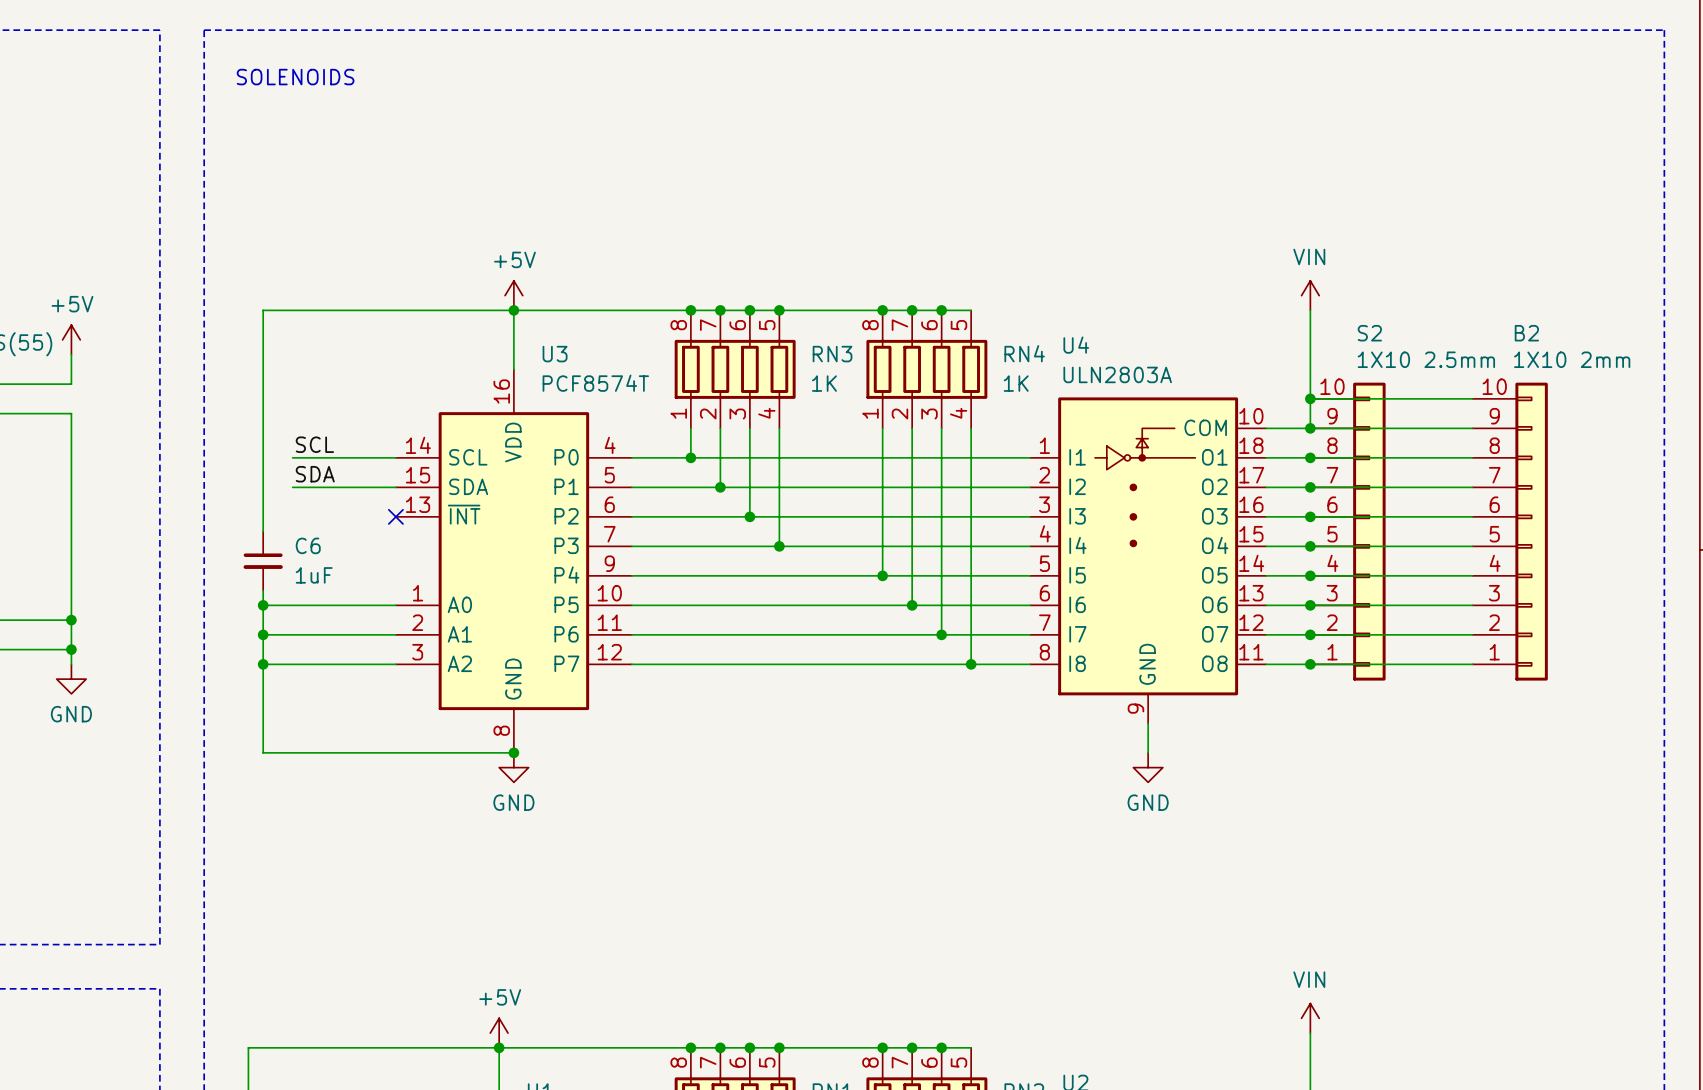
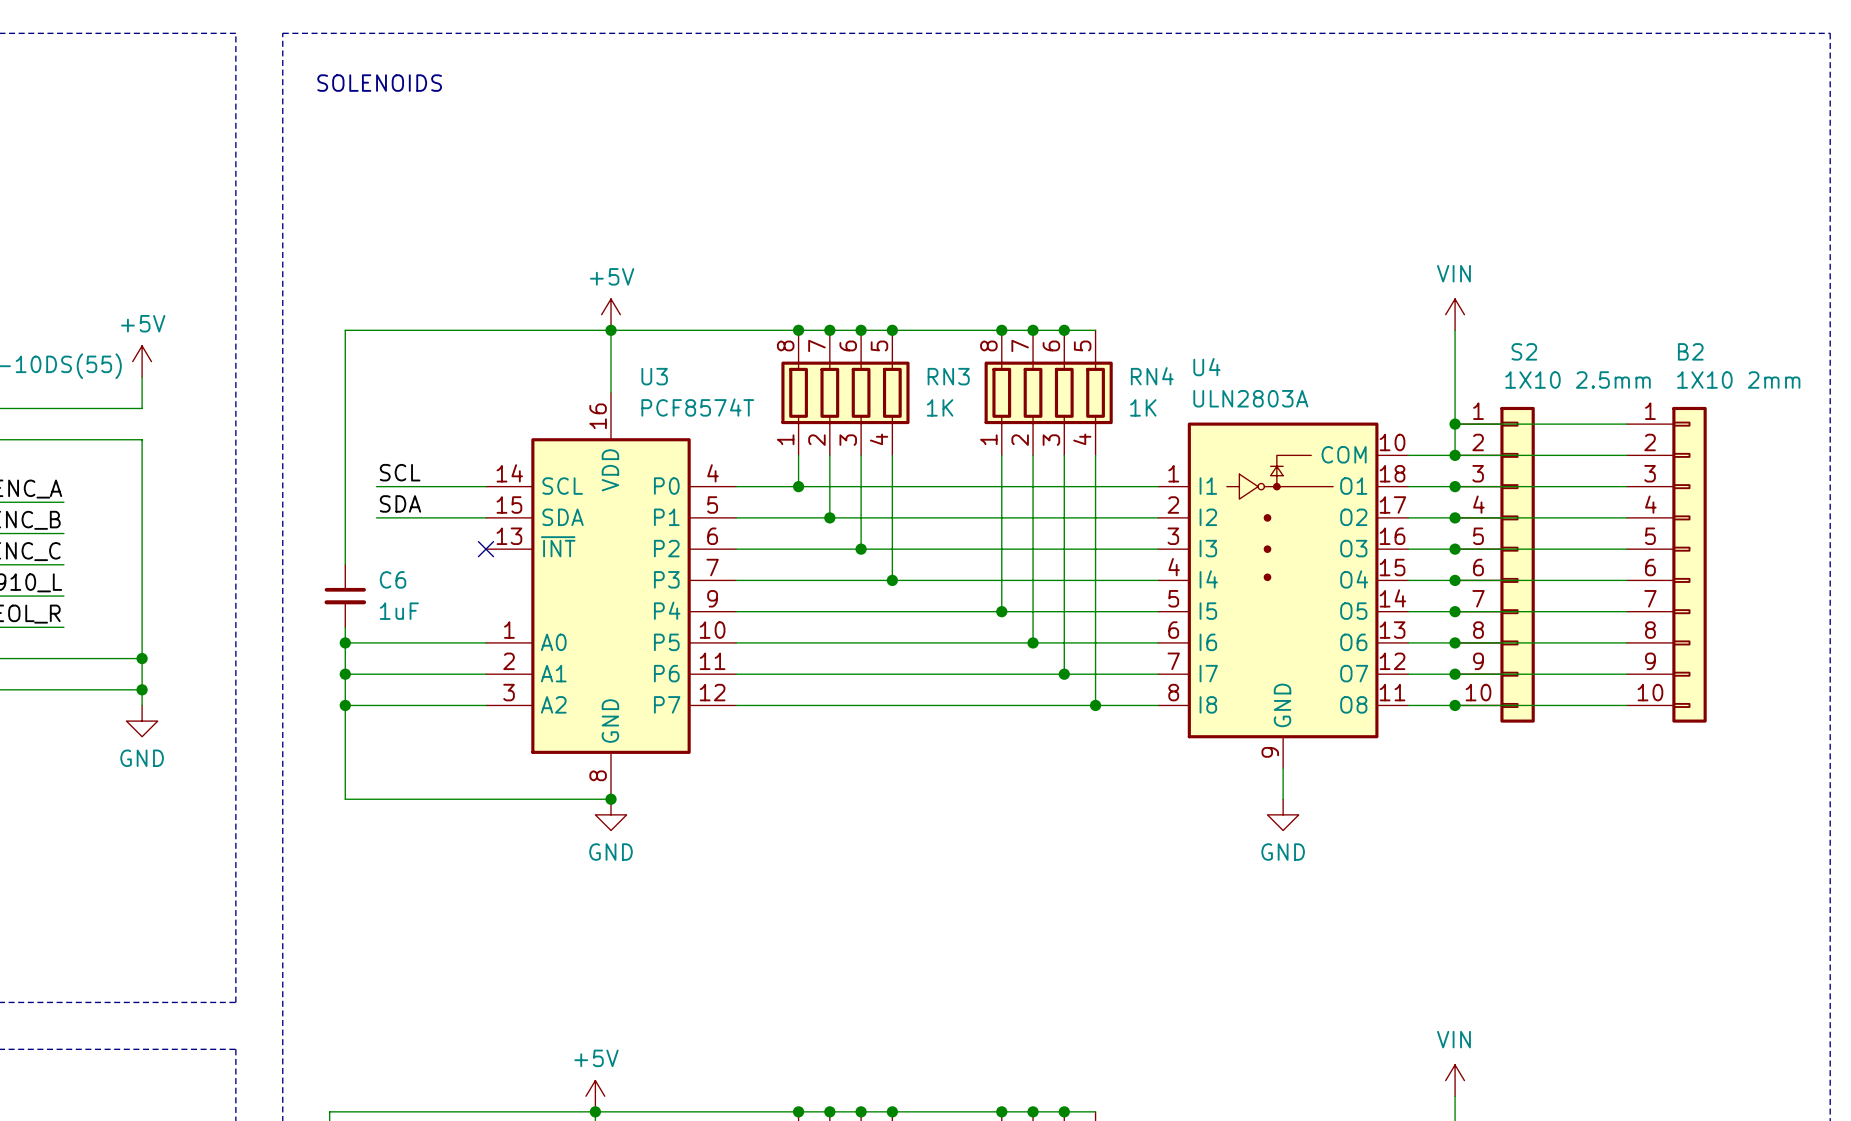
S2 flip: as is (1369, 531) -> up-down (1517, 564)
B2 flip: as is (1531, 531) -> up-down (1689, 564)

